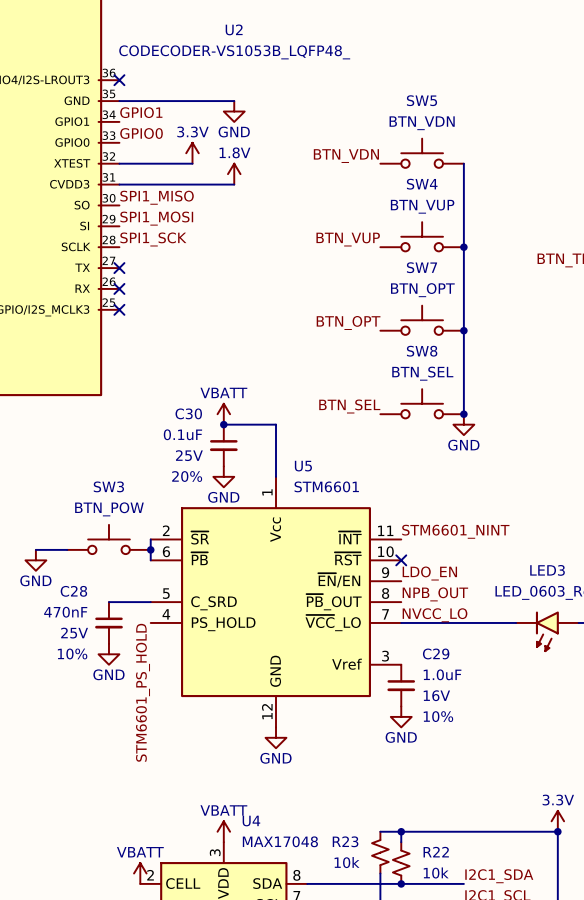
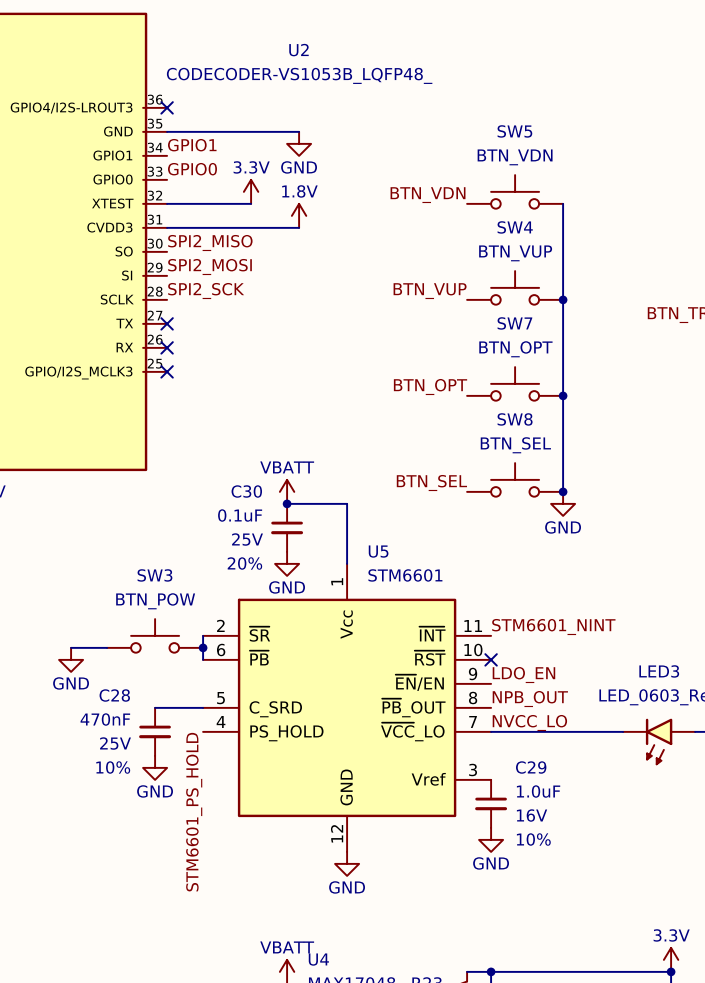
label: SPI1_MISO (157, 197) -> SPI2_MISO (210, 243)
label: SPI1_MOSI (156, 218) -> SPI2_MOSI (210, 267)
label: SPI1_SCK (153, 239) -> SPI2_SCK (206, 291)

